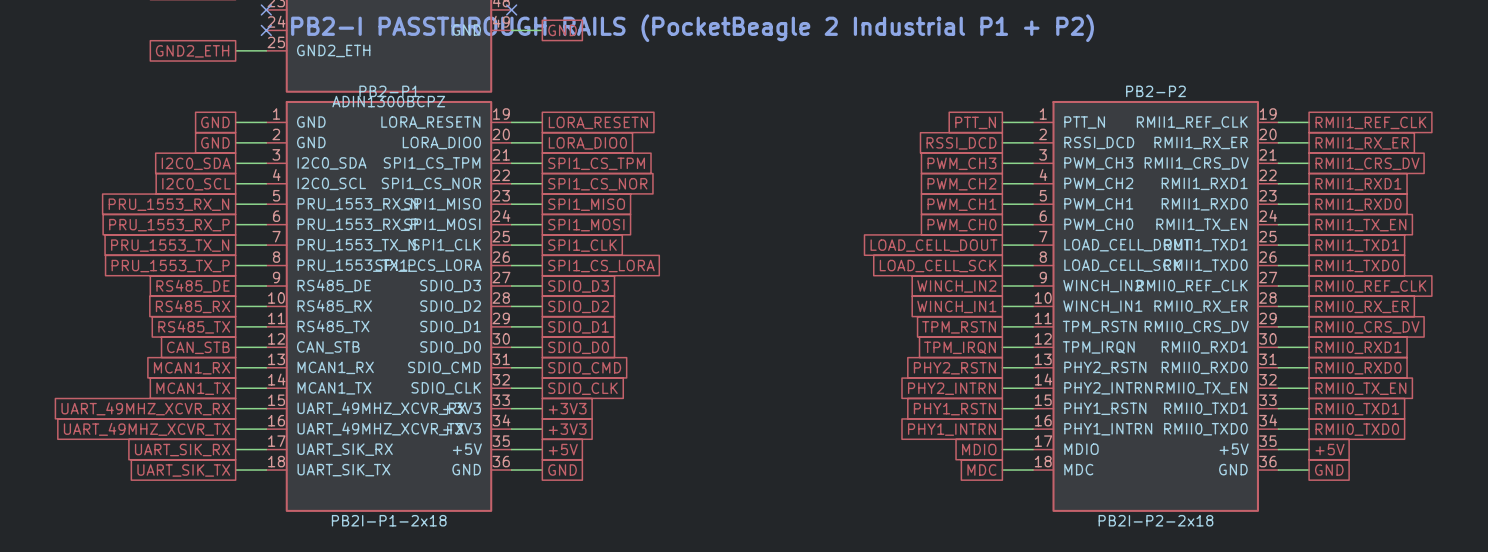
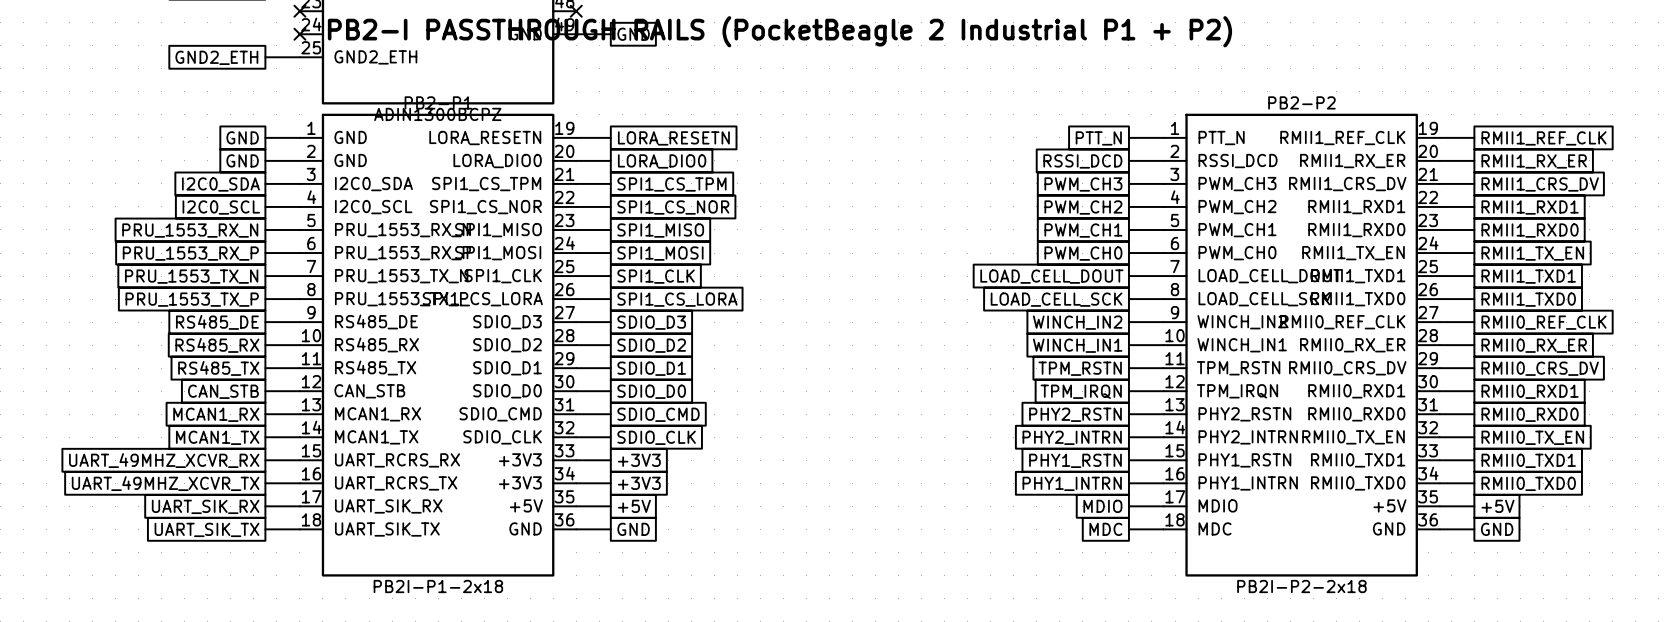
PB2-P1 pin name: UART_49MHZ_XCVR_RX (381, 408) -> UART_RCRS_RX (397, 460)
PB2-P1 pin name: UART_49MHZ_XCVR_TX (380, 428) -> UART_RCRS_TX (396, 483)

